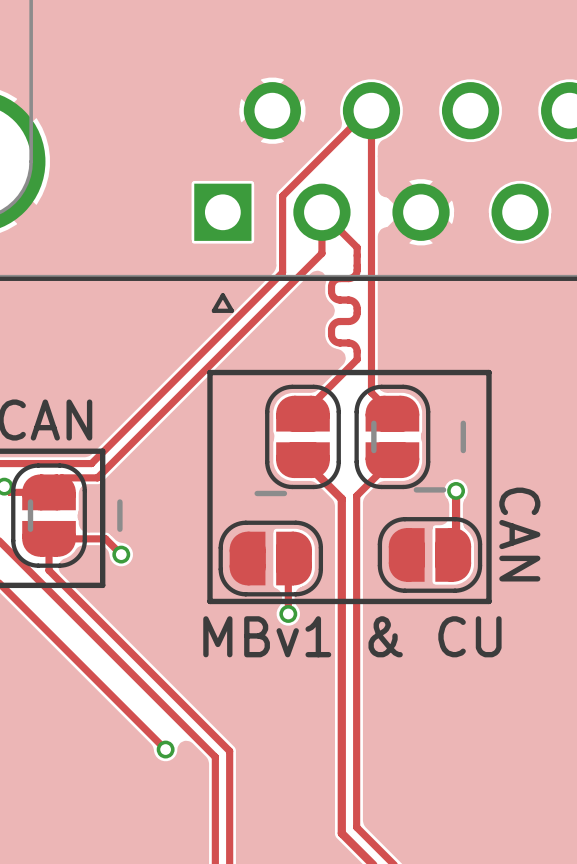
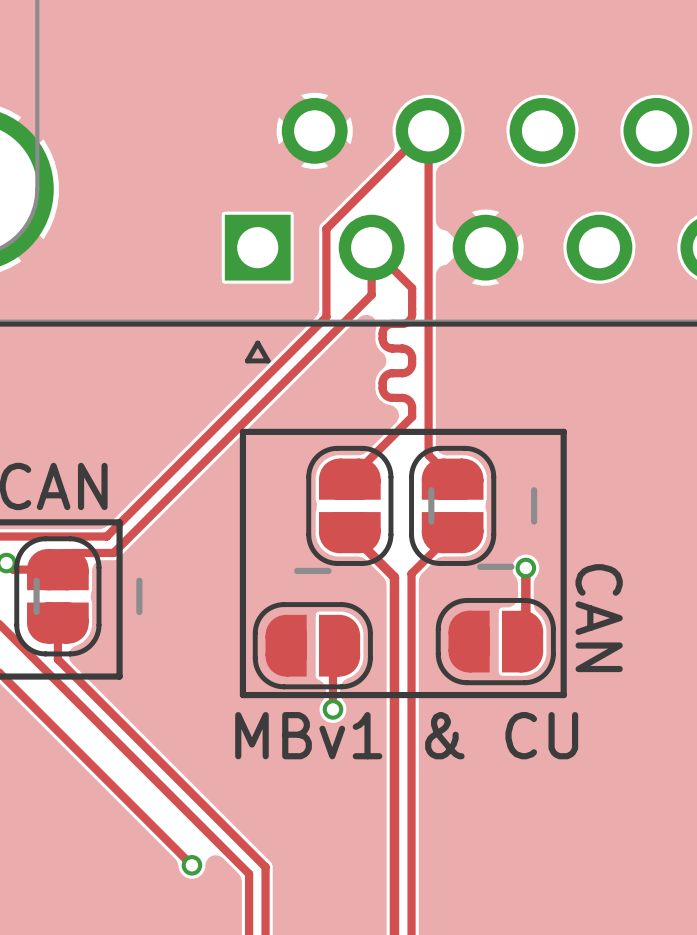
track: (49, 538) (105, 538) (121, 554) -> none
via: (121, 554) -> none

